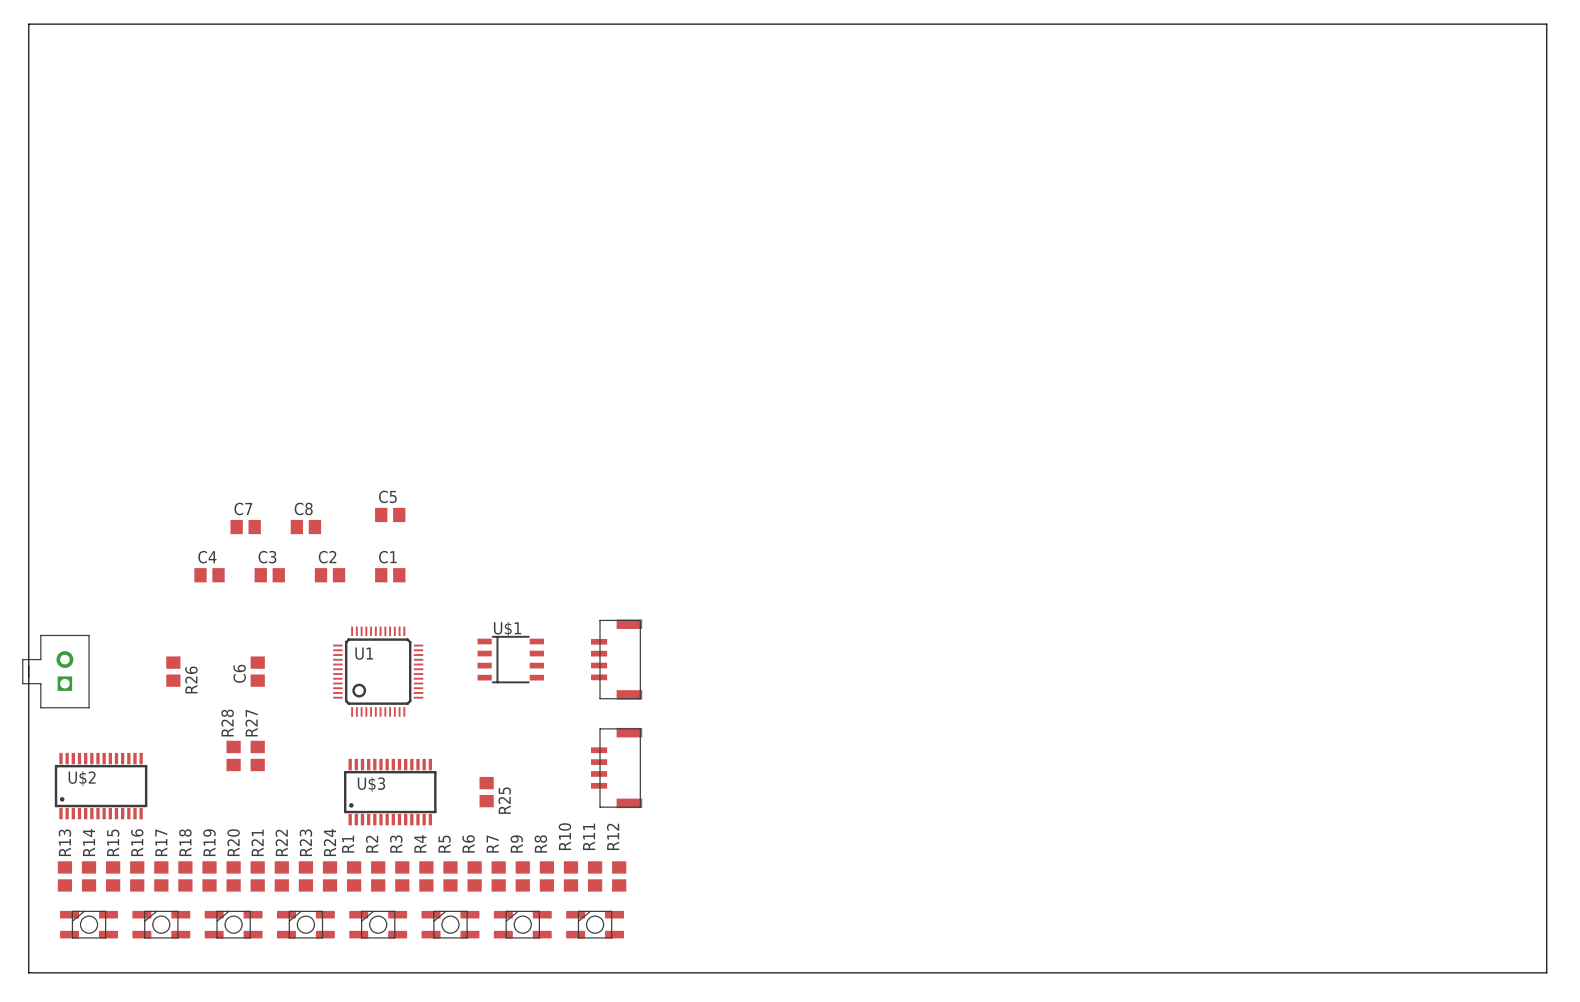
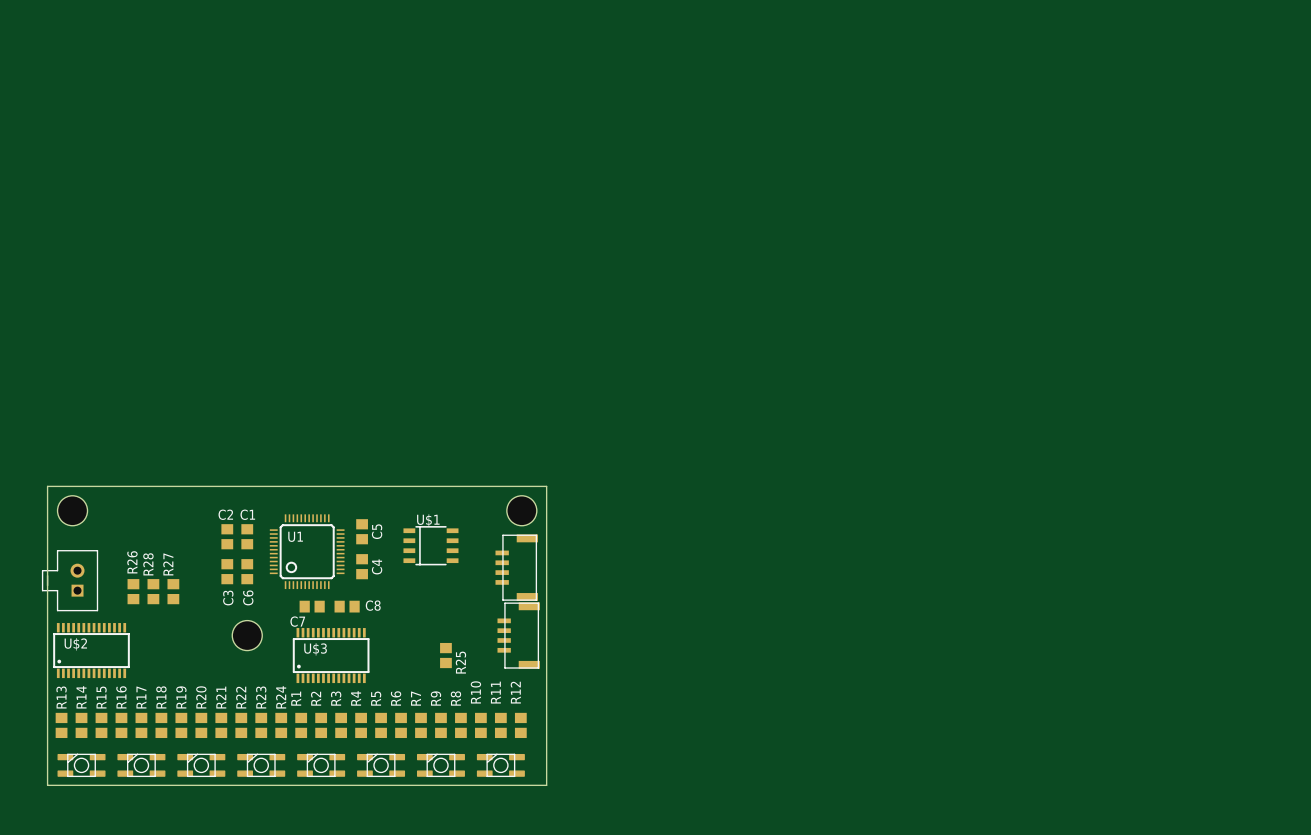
board edge: (28, 24) (1546, 24) (1546, 972) (28, 972) (28, 24) -> none
C7 name position: C7 (243, 508) -> C7 (297, 621)
C8 name position: C8 (303, 508) -> C8 (373, 605)
C5 rotation: 0° (390, 514) -> 90° clockwise (362, 531)
C5 position: (390, 514) -> (362, 531)
C7 position: (245, 527) -> (312, 606)
C8 position: (305, 527) -> (347, 606)
C3 name position: C3 (267, 557) -> C3 (228, 598)
C4 rotation: 0° (209, 575) -> 90° clockwise (362, 566)
C4 position: (209, 575) -> (362, 566)
C3 rotation: 0° (269, 575) -> 90° clockwise (227, 571)
C3 position: (269, 575) -> (227, 571)
C2 rotation: 0° (330, 575) -> 90° clockwise (227, 536)
C2 position: (330, 575) -> (227, 536)
C1 rotation: 0° (390, 575) -> 90° clockwise (247, 536)
C1 position: (390, 575) -> (247, 536)
board edge: none -> (47, 486) (546, 486) (546, 785) (47, 785) (47, 486)
hole: none -> (72, 510)
hole: none -> (521, 510)
part position: (616, 659) -> (516, 567)
part position: (55, 671) -> (70, 580)
R26 position: (173, 671) -> (133, 591)
C6 position: (257, 671) -> (247, 571)
U1 position: (378, 671) -> (307, 551)
C6 name position: C6 (239, 673) -> C6 (248, 597)
R26 name position: R26 (191, 679) -> R26 (132, 562)
R28 position: (233, 755) -> (153, 591)
R27 position: (257, 755) -> (173, 591)
hole: none -> (247, 635)
R25 position: (486, 792) -> (445, 655)

